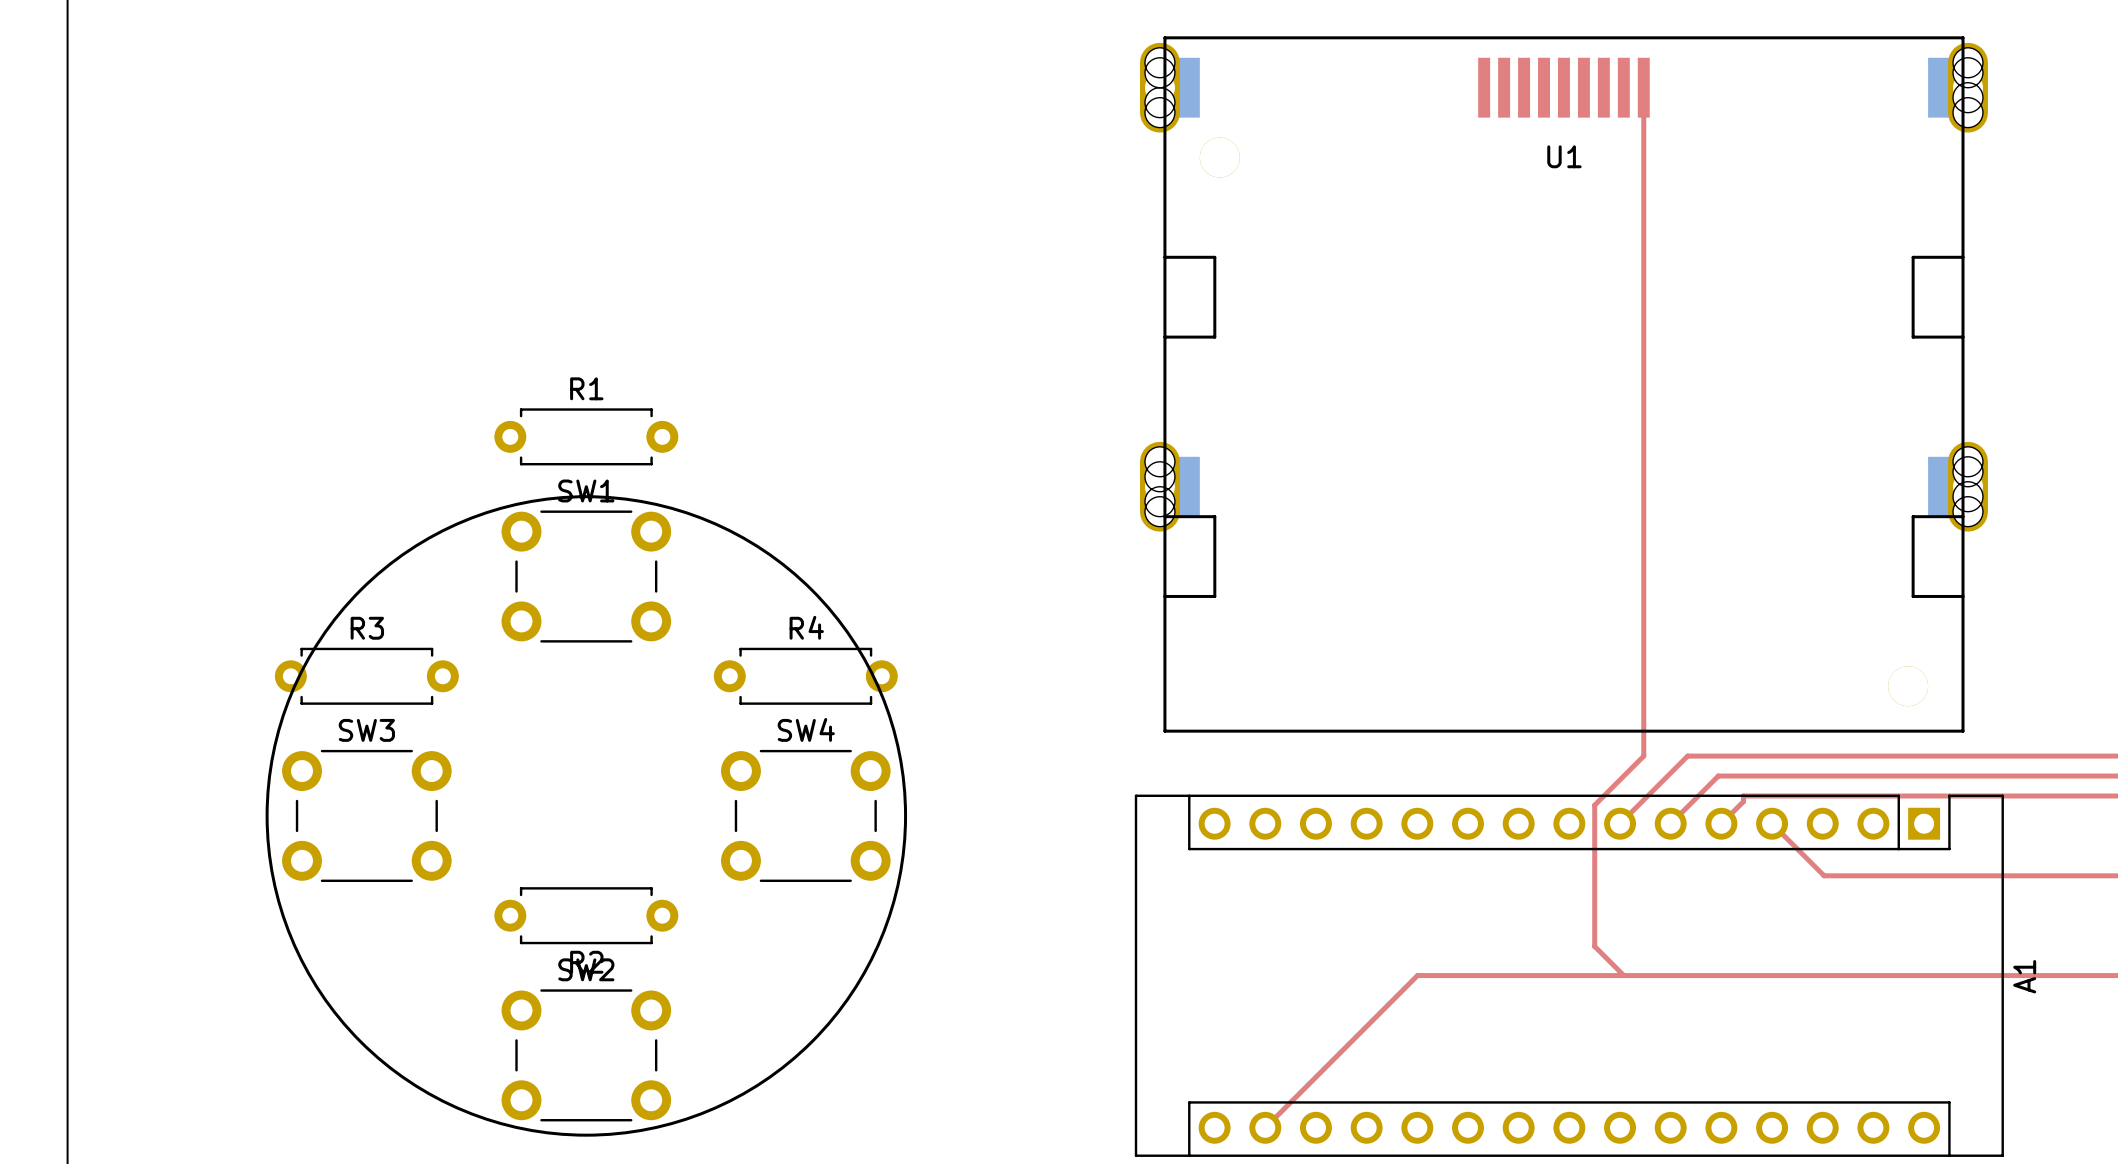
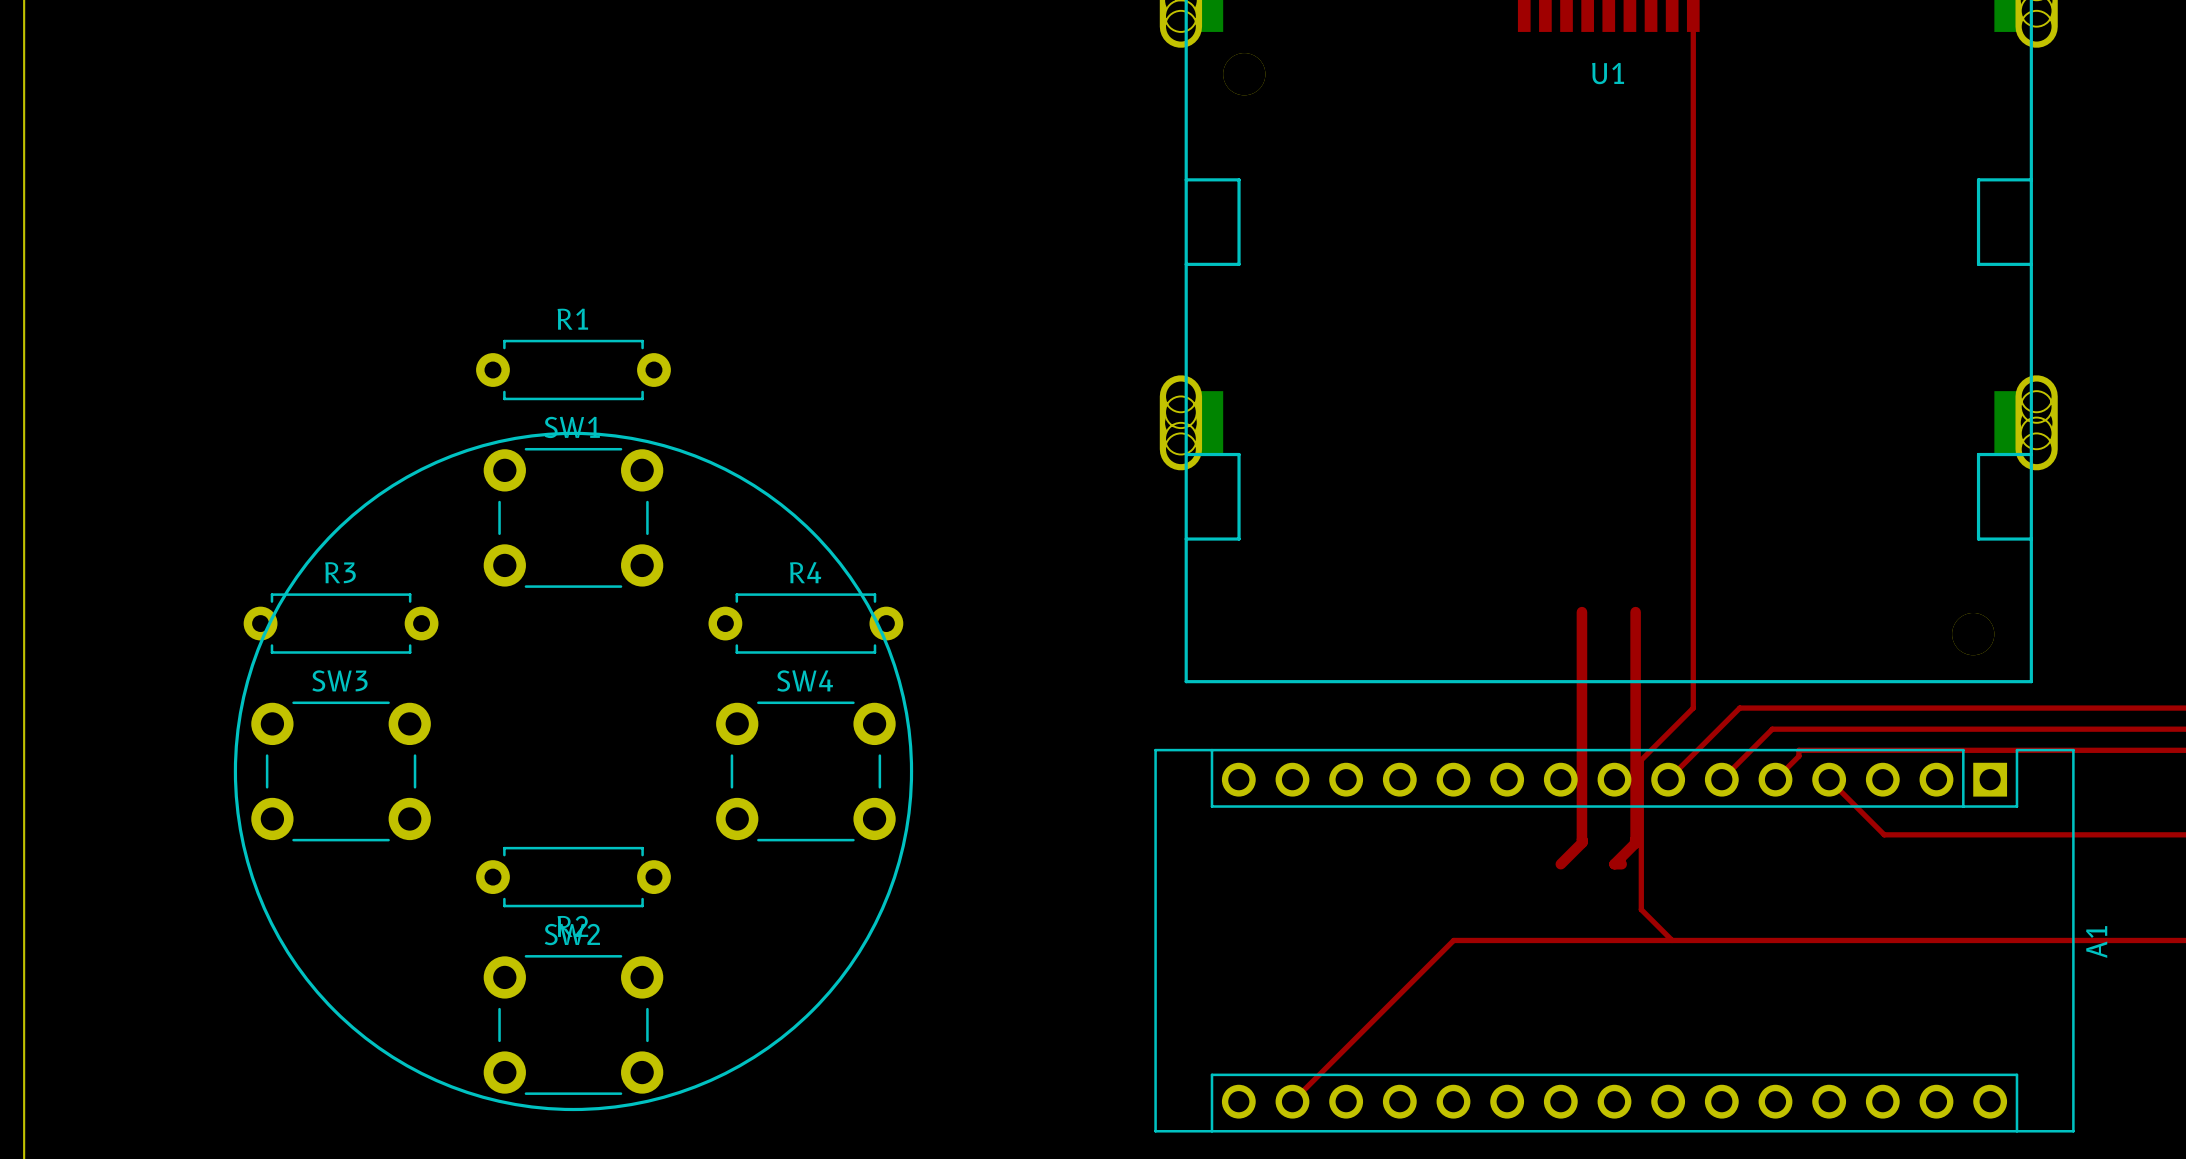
top track: none -> (1581, 612) (1582, 842) (1560, 864)
top track: none -> (1635, 612) (1635, 839) (1635, 843) (1614, 864) (1621, 864)

